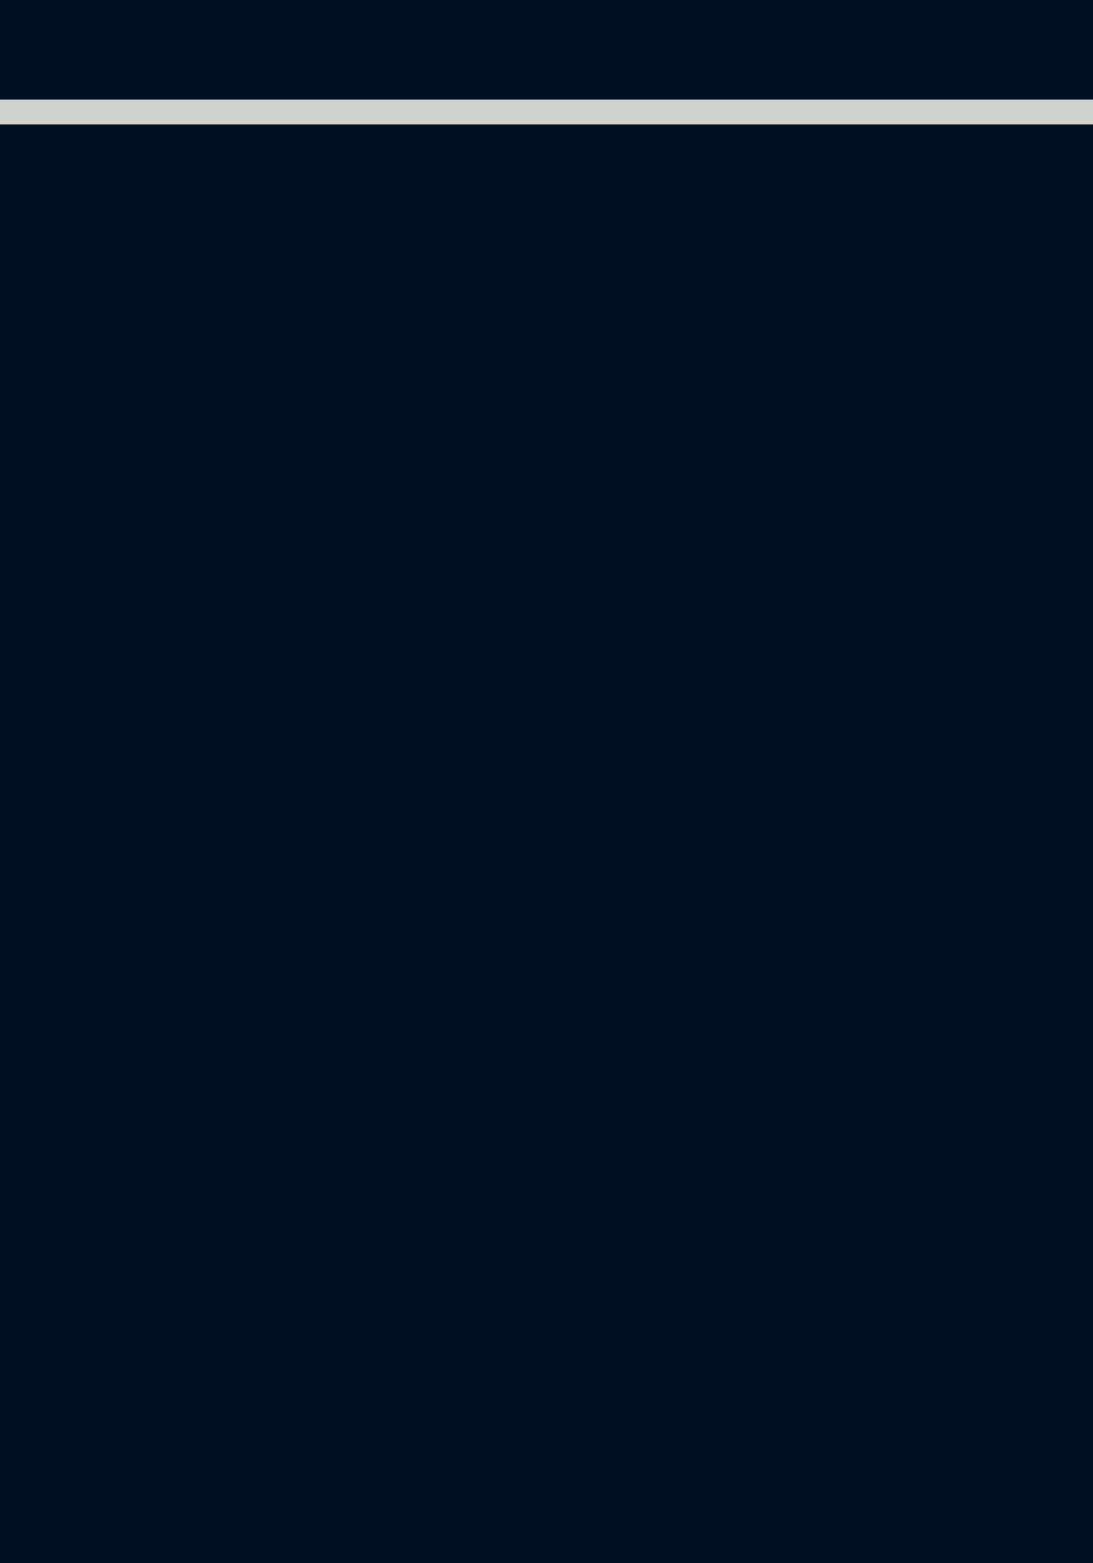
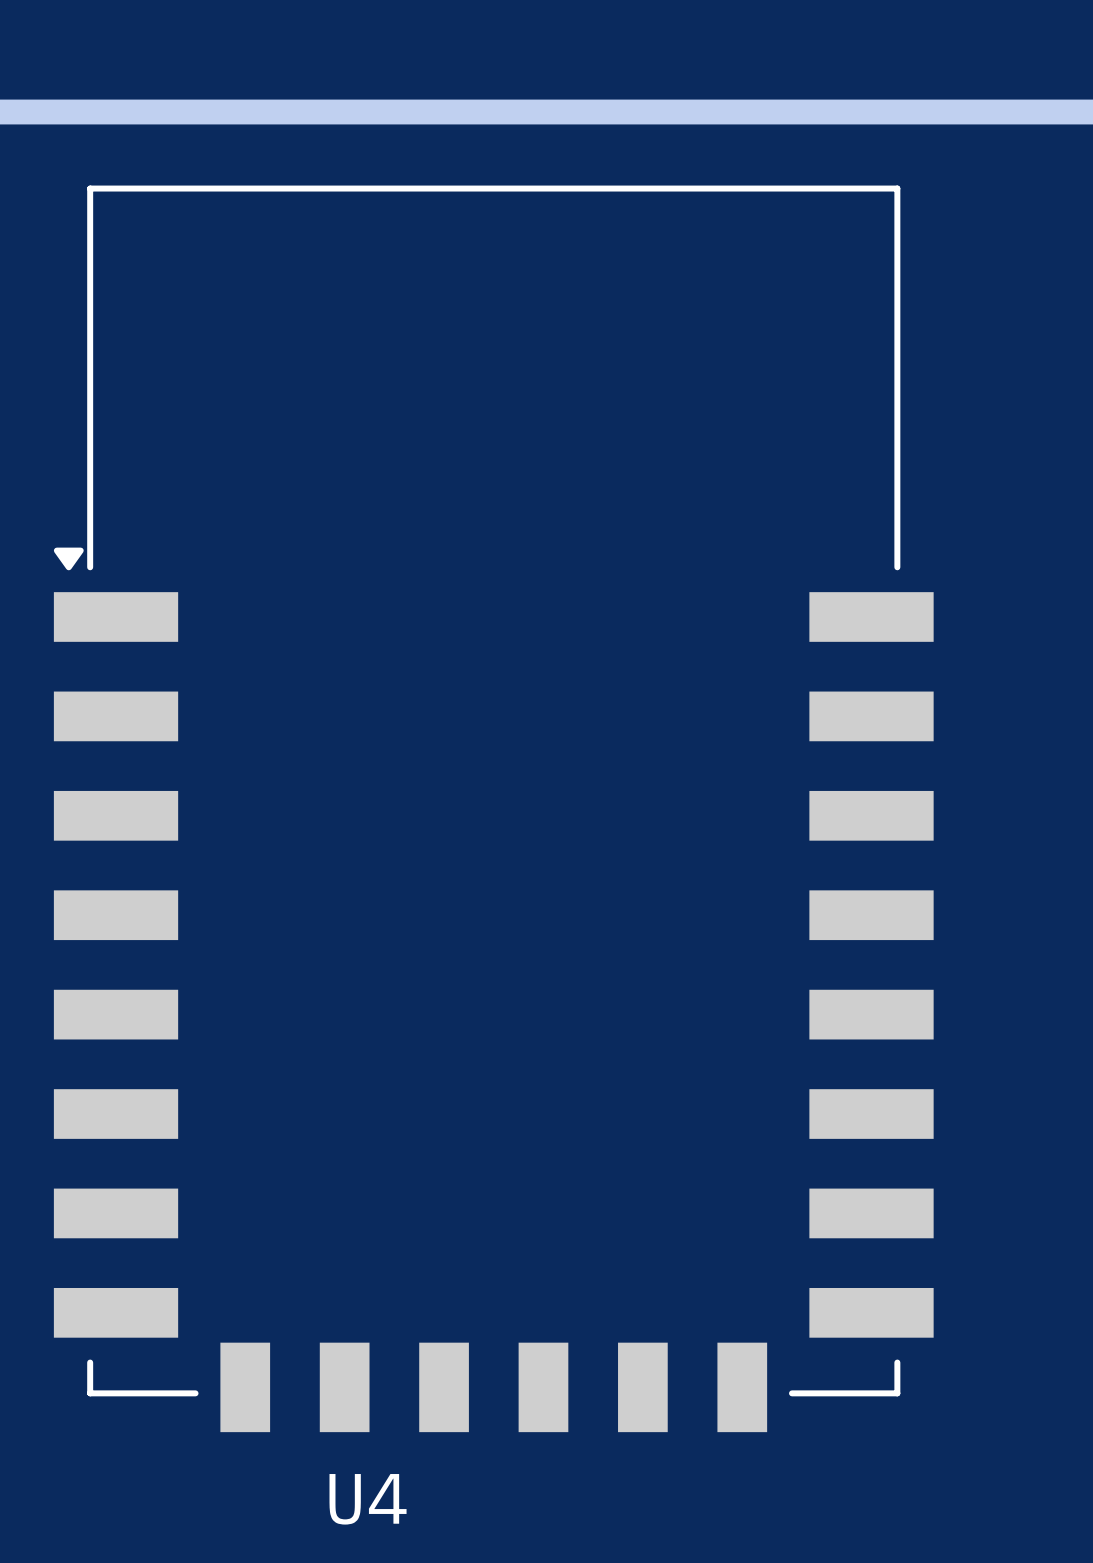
U4: none -> (493, 808)

